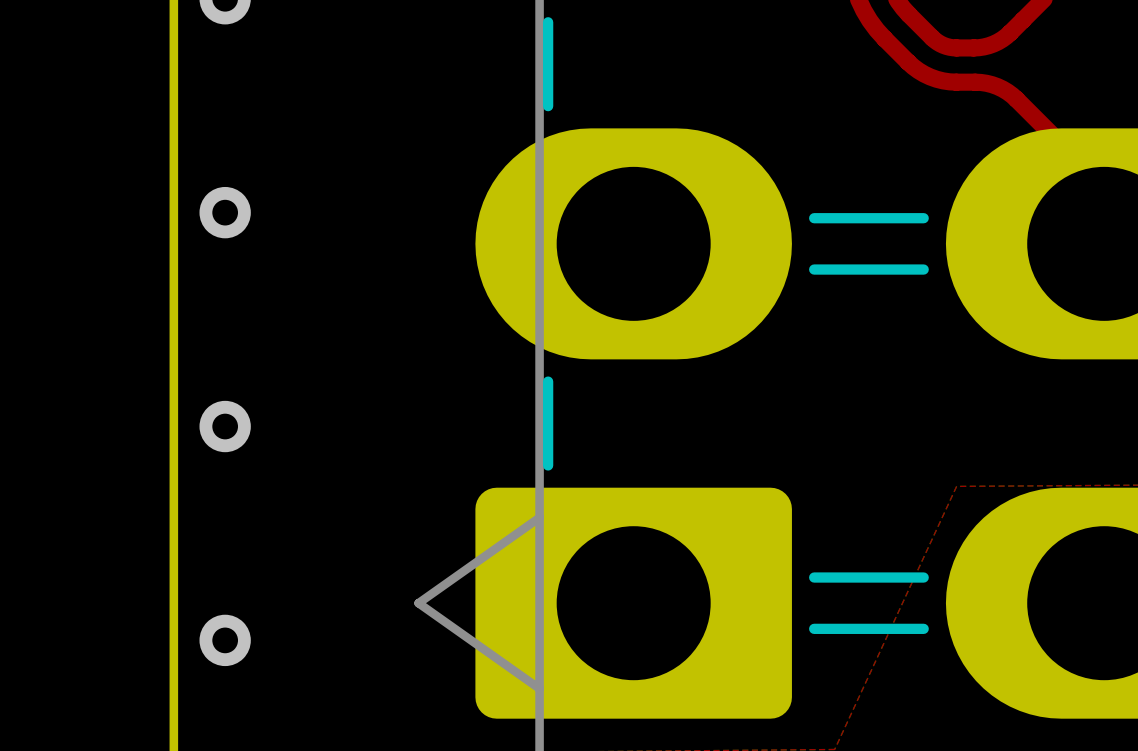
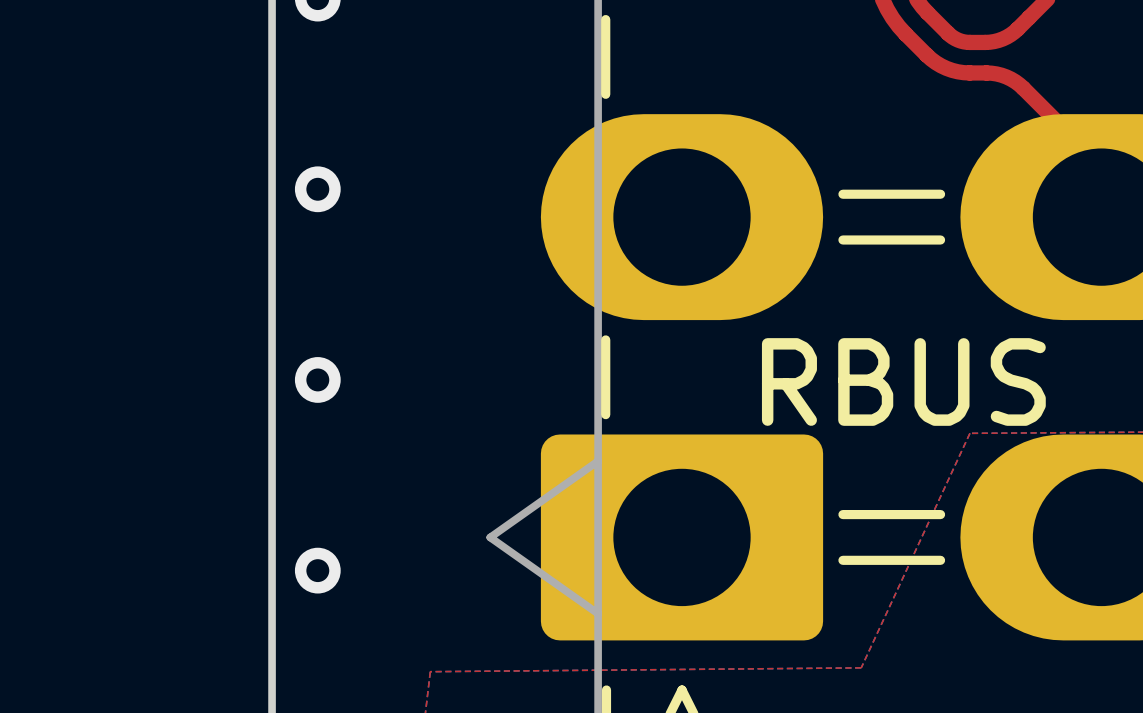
part text: none -> RBUS (903, 381)

